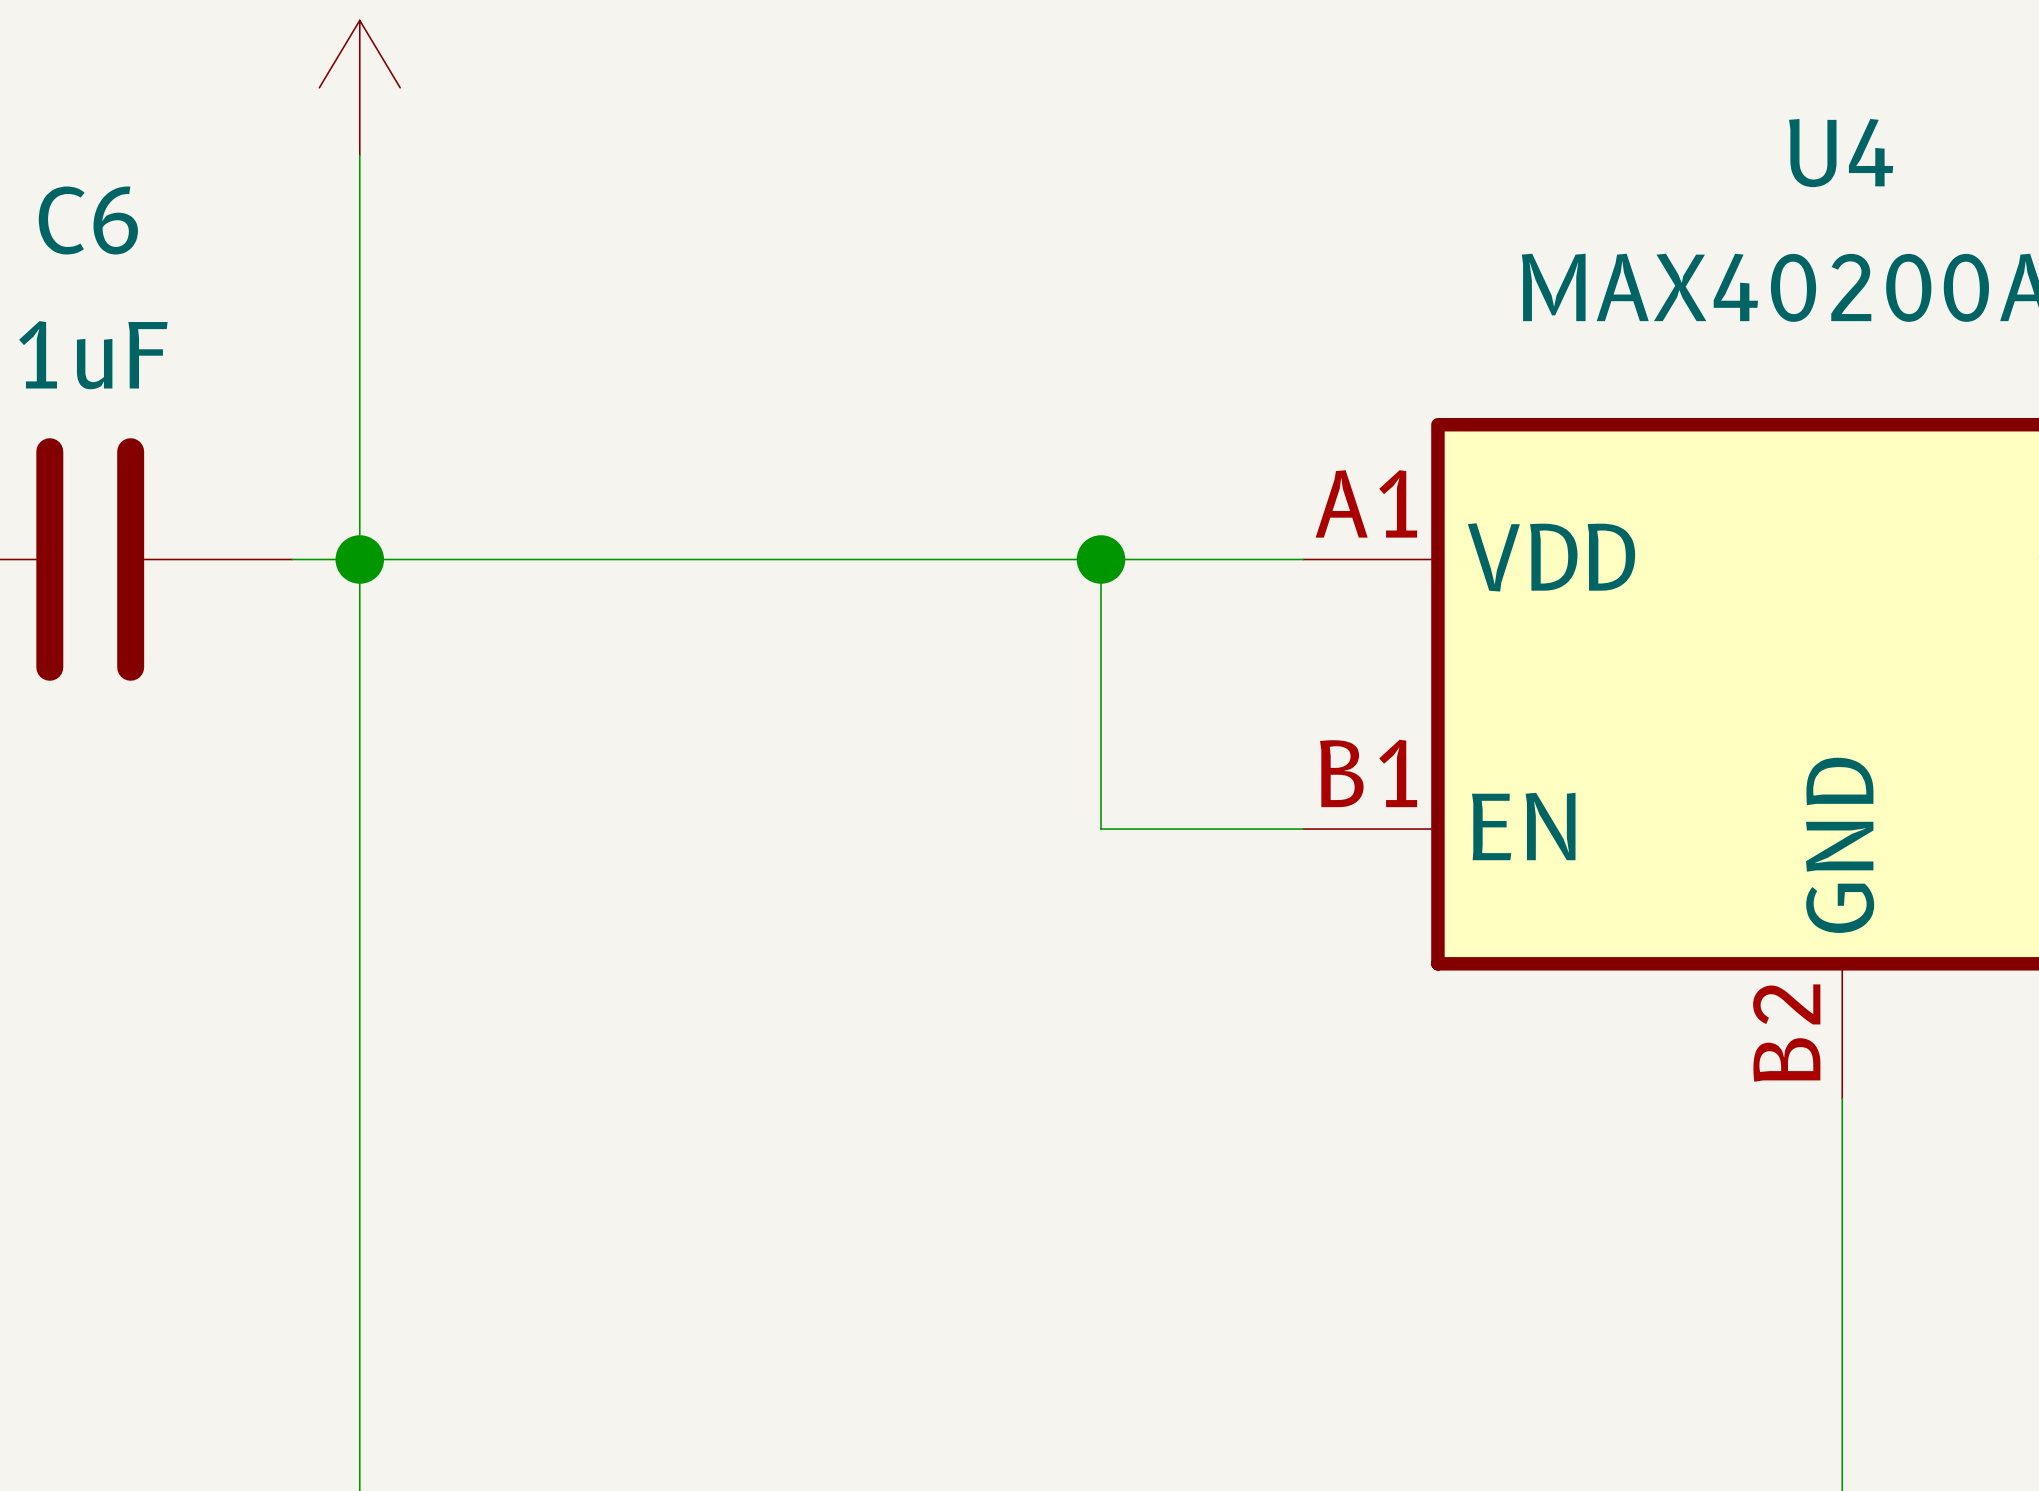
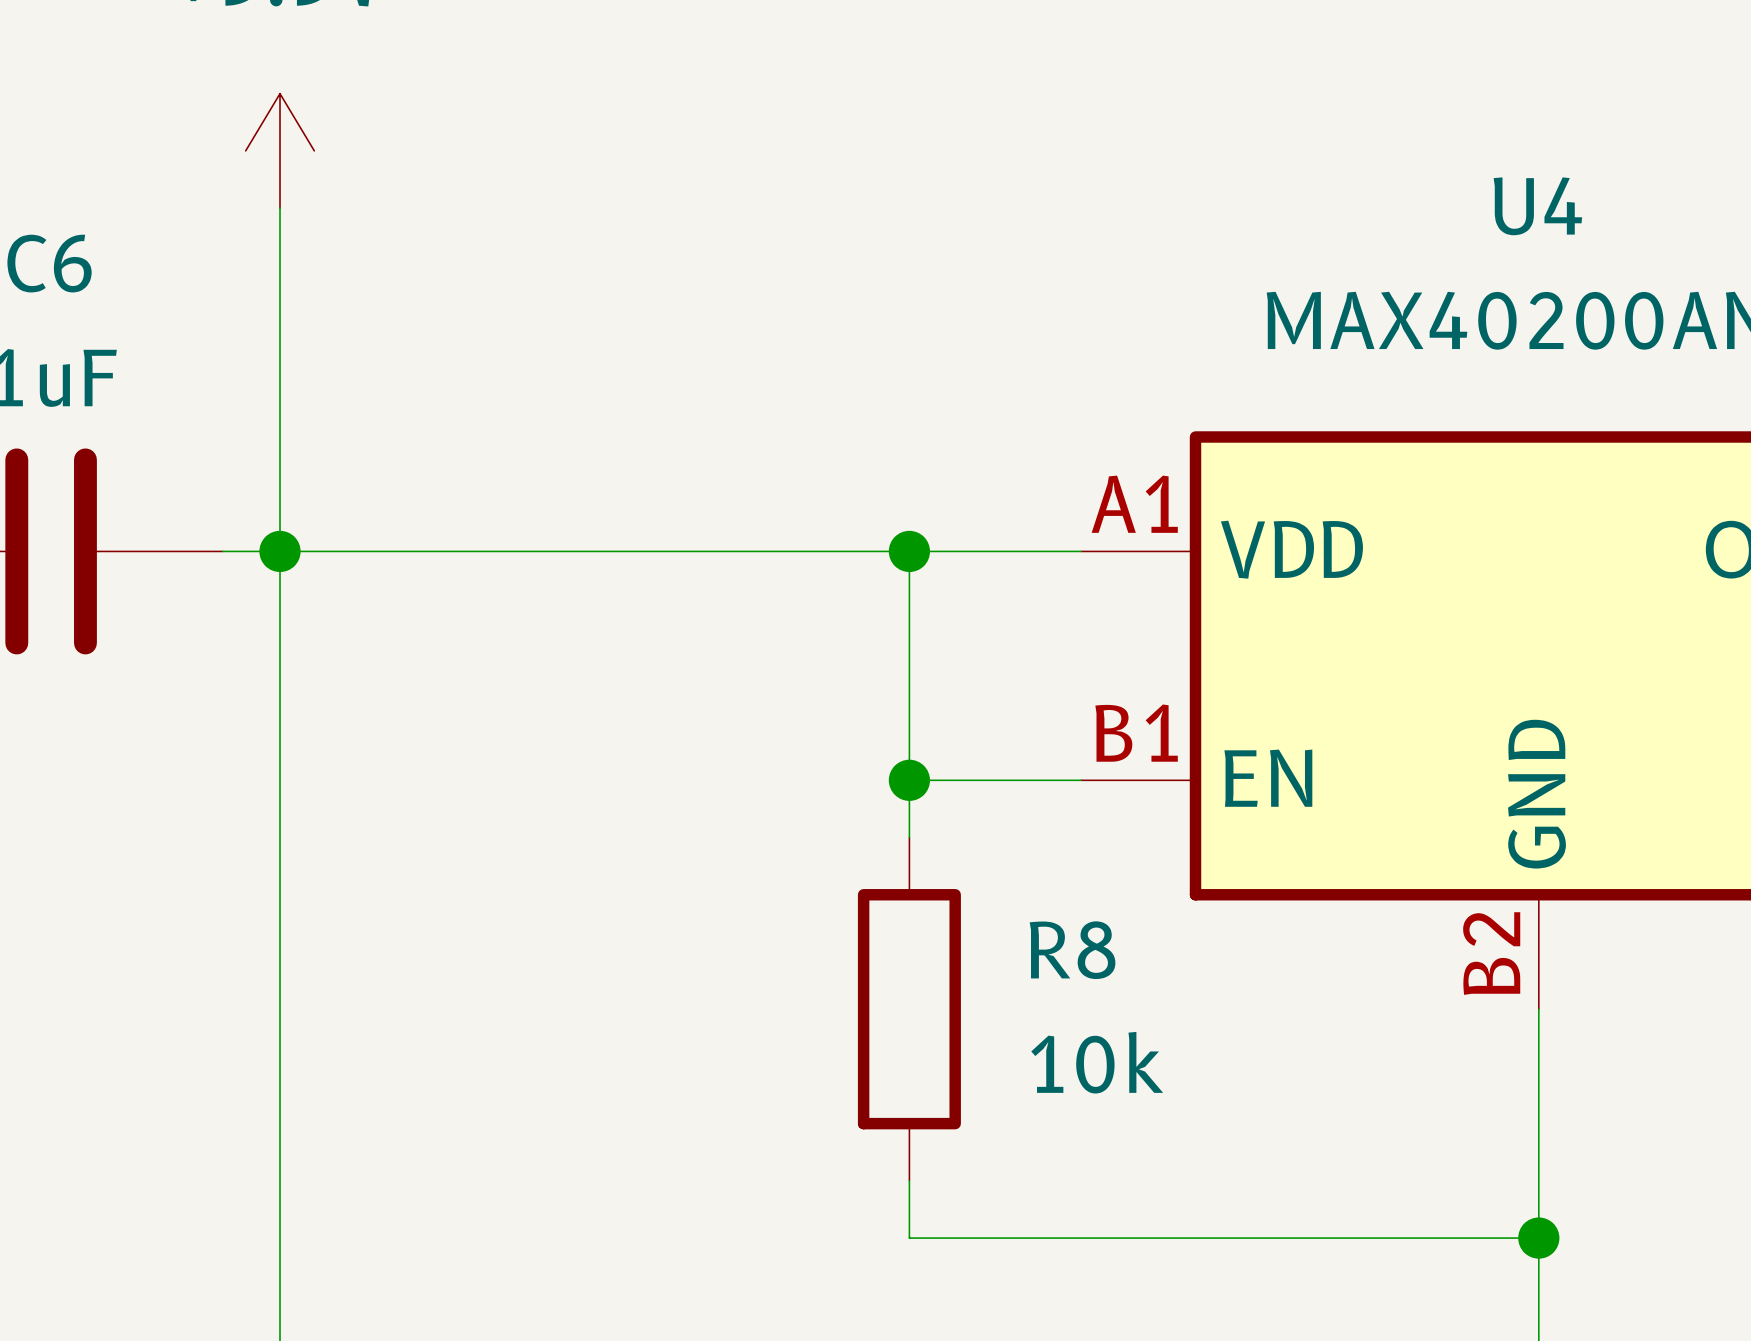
wire: none -> (909, 780) (909, 837)
junction: none -> (909, 780)
R8: none -> 10k (909, 1009)
wire: none -> (909, 1180) (909, 1238) (1538, 1238)
junction: none -> (1538, 1238)

